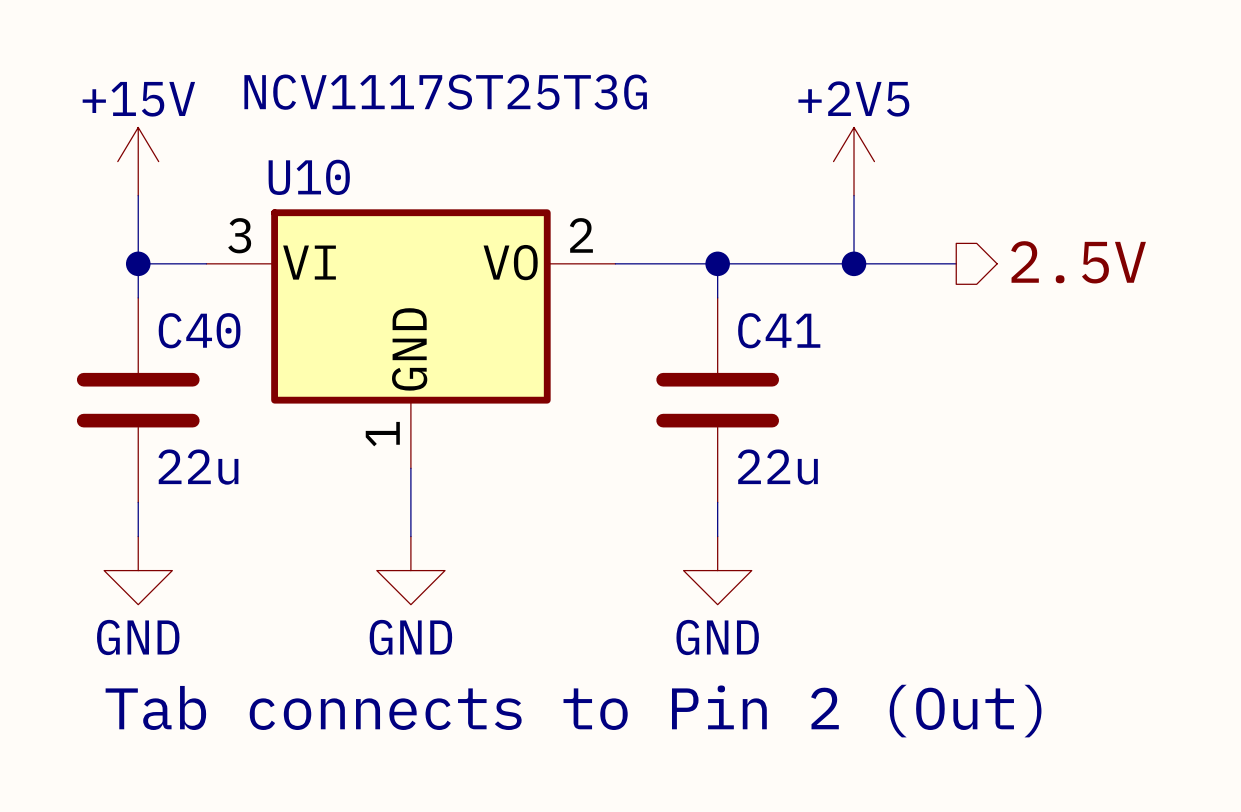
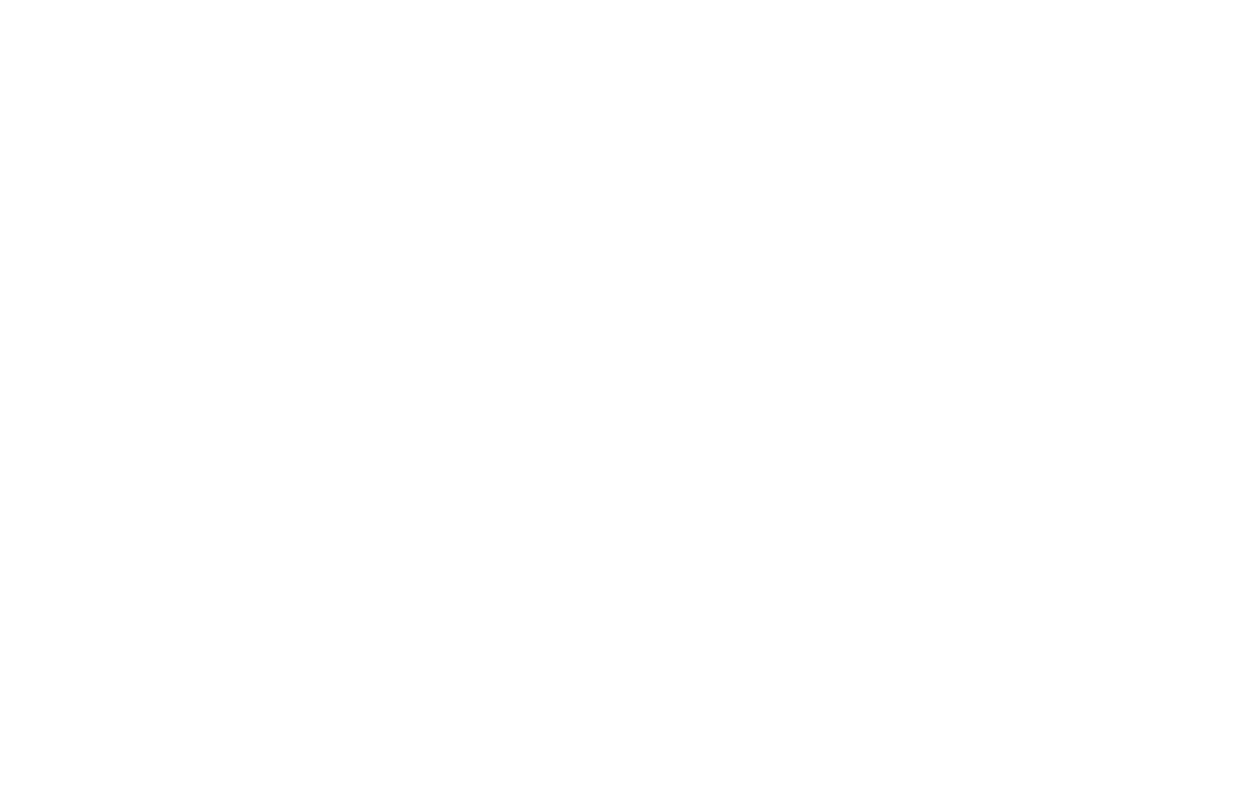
power symbol: +15V (138, 161) -> none
power symbol: +2V5 (854, 161) -> none
wire: (138, 195) (138, 297) -> none
wire: (854, 195) (854, 263) -> none
hierarchical label: 2.5V (1078, 262) -> none
wire: (138, 263) (206, 263) -> none
junction: (138, 263) -> none
wire: (615, 263) (956, 263) -> none
wire: (717, 263) (717, 297) -> none
junction: (717, 263) -> none
junction: (854, 263) -> none
U10: NCV1117ST25T3G (410, 338) -> none
C40: 22u (138, 400) -> none
C41: 22u (717, 400) -> none
wire: (410, 468) (410, 536) -> none
wire: (138, 502) (138, 536) -> none
wire: (717, 502) (717, 536) -> none
power symbol: GND (138, 570) -> none
power symbol: GND (410, 570) -> none
power symbol: GND (717, 570) -> none
text: Tab connects to Pin 2 (Out) (573, 711) -> none

